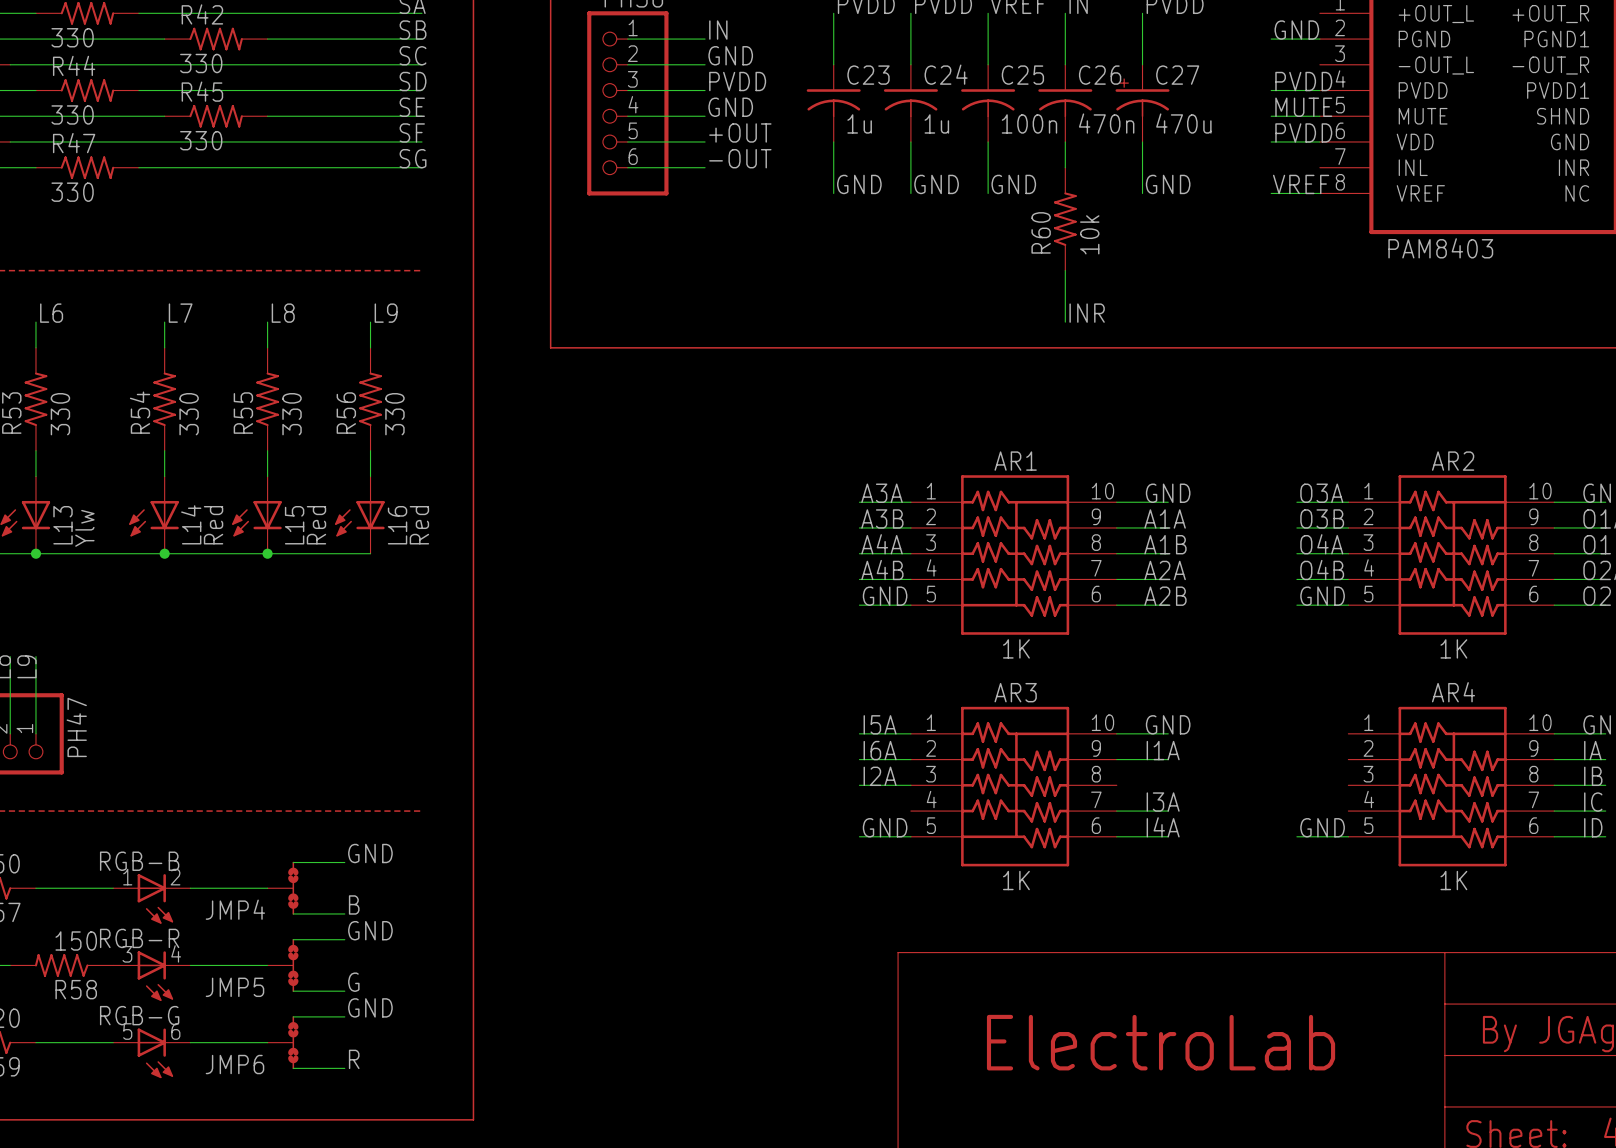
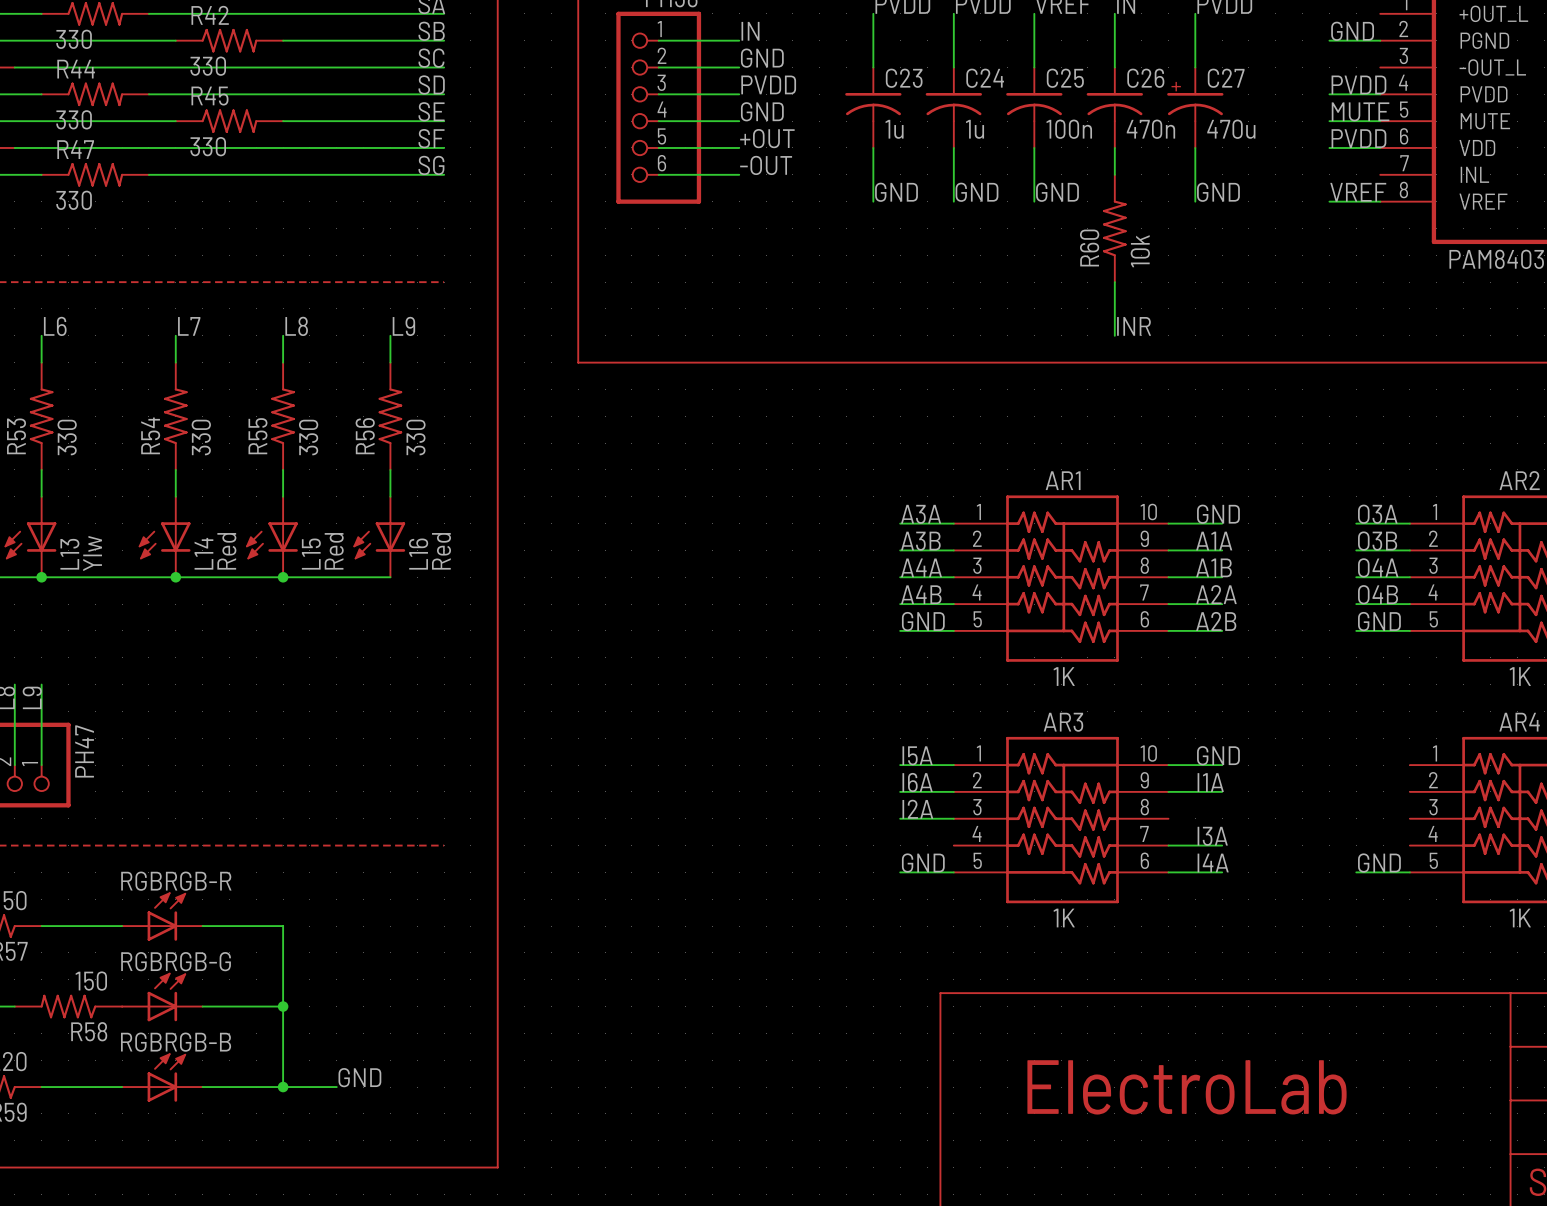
label: GND (370, 853) -> none
wire: (293, 862) (344, 862) -> none
RGBRGB-R: none -> (162, 916)
wire: none -> (283, 926) (283, 1087) (336, 1087)
JMP4: (283, 888) -> none
RGB-B: (151, 898) -> none
label: B (354, 904) -> none
wire: (293, 913) (344, 913) -> none
label: GND (370, 930) -> none
wire: (293, 939) (344, 939) -> none
RGBRGB-G: none -> (162, 997)
junction: none -> (283, 1006)
JMP5: (283, 965) -> none
RGB-R: (151, 976) -> none
label: G (353, 982) -> none
wire: (293, 991) (344, 991) -> none
label position: GND (370, 1007) -> GND (359, 1077)
wire: (293, 1016) (344, 1016) -> none
RGBRGB-B: none -> (162, 1077)
junction: none -> (283, 1087)
JMP6: (283, 1042) -> none
RGB-G: (151, 1053) -> none
label: R (354, 1059) -> none
wire: (293, 1068) (344, 1068) -> none

